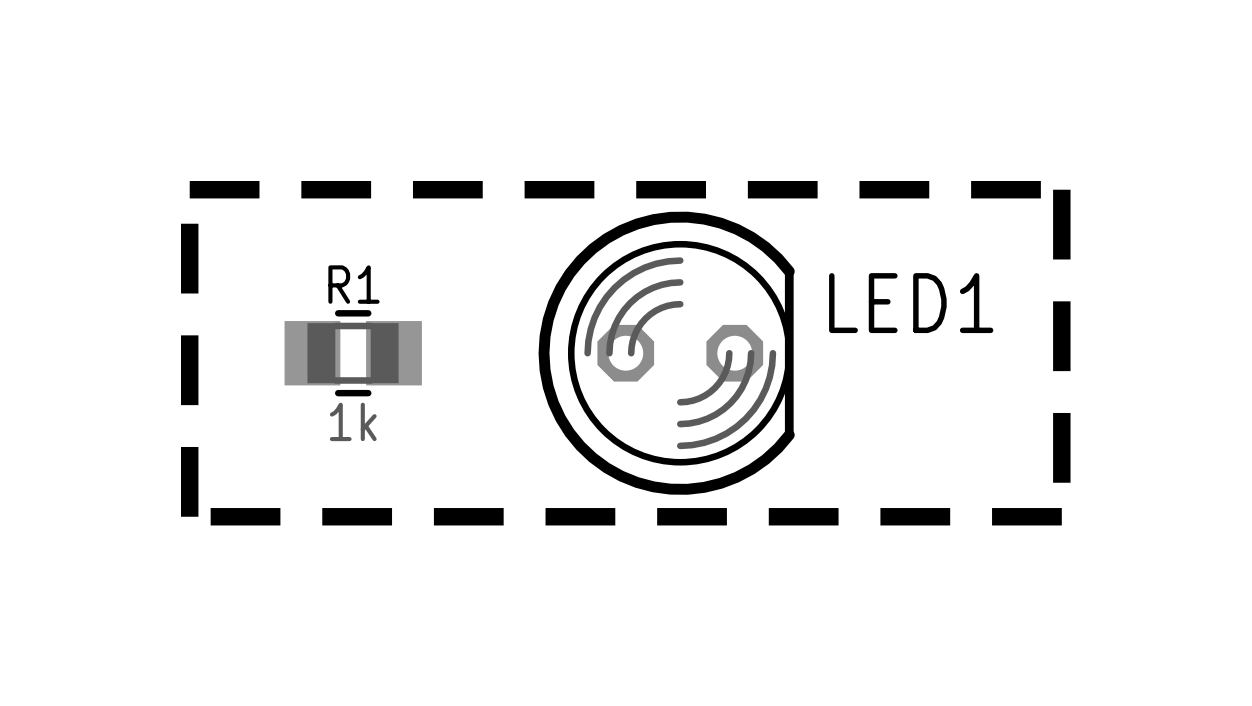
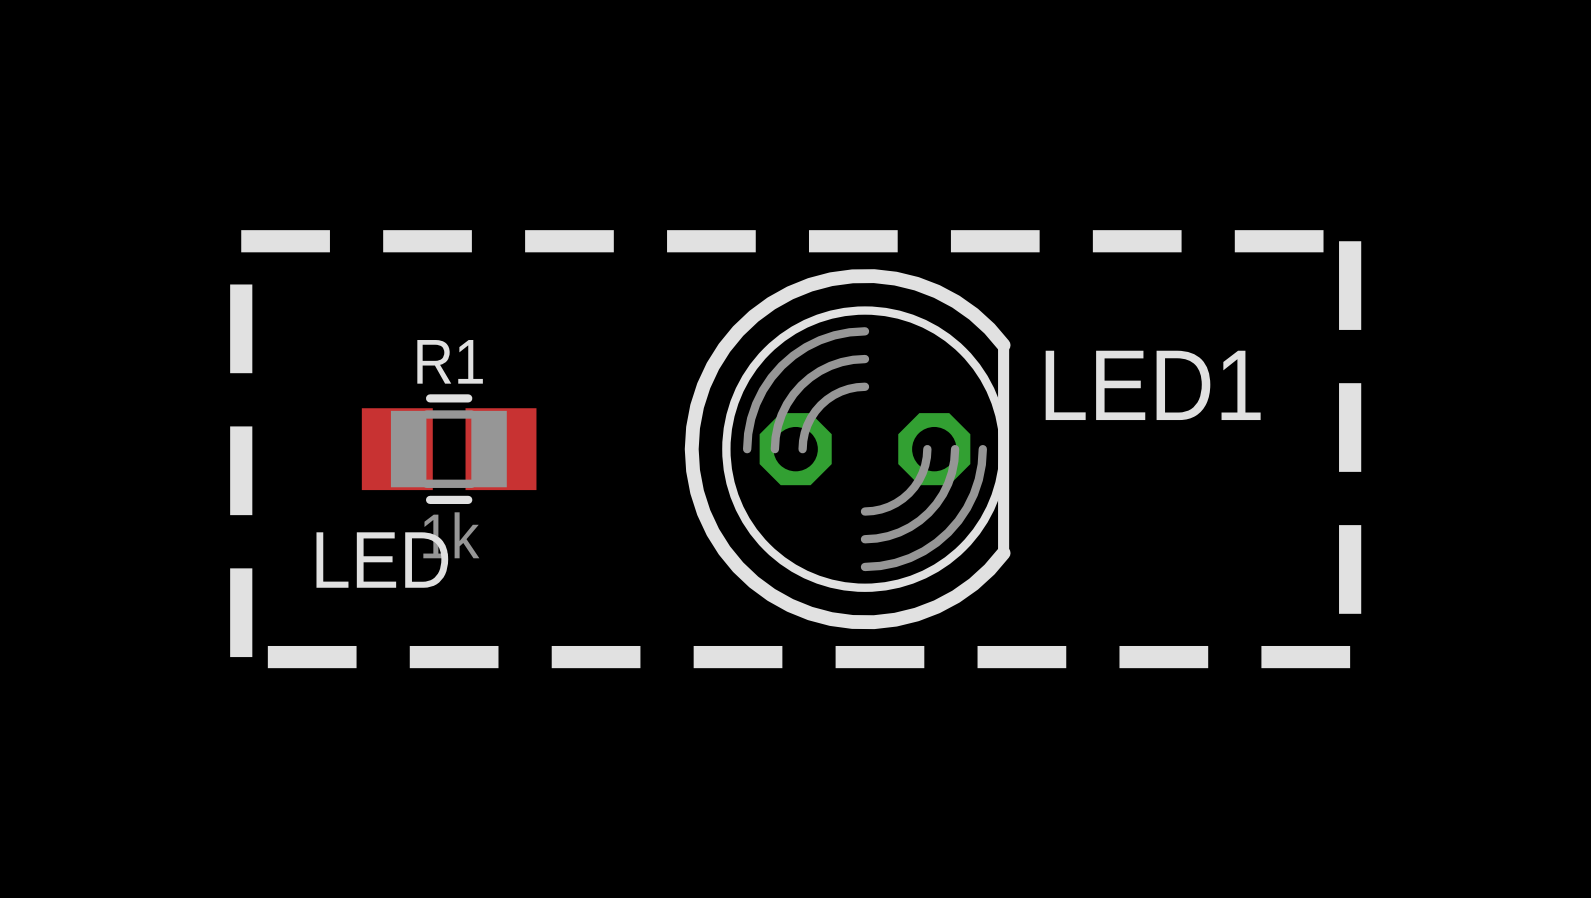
text: none -> LED (382, 560)

